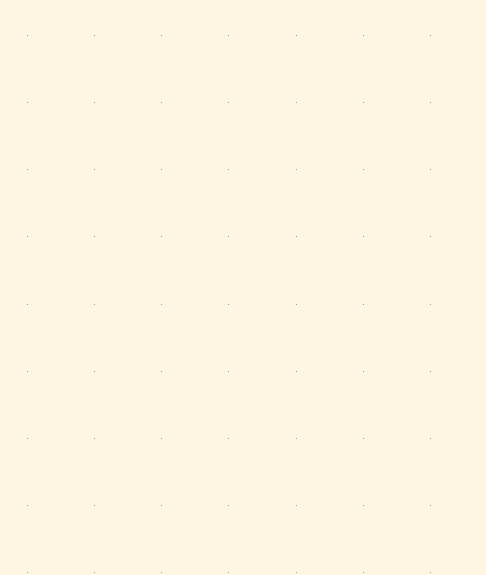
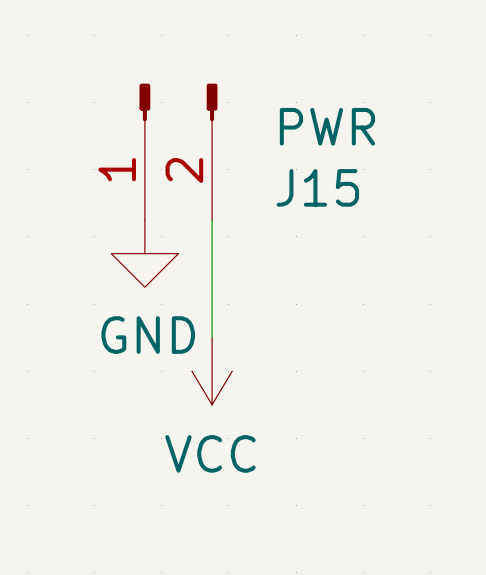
J15: none -> PWR (178, 151)
wire: none -> (212, 220) (212, 337)
power symbol: none -> GND (144, 253)
power symbol: none -> VCC (212, 371)

